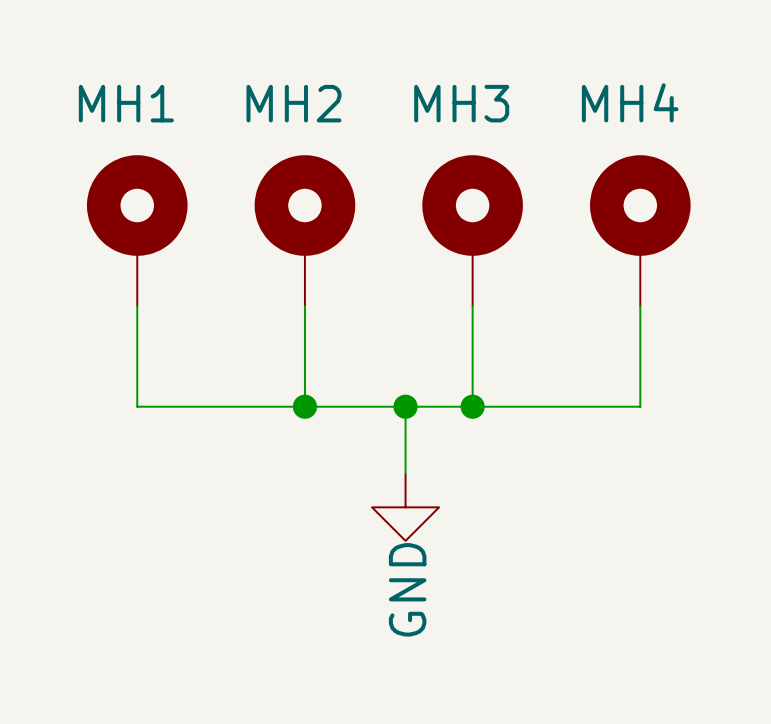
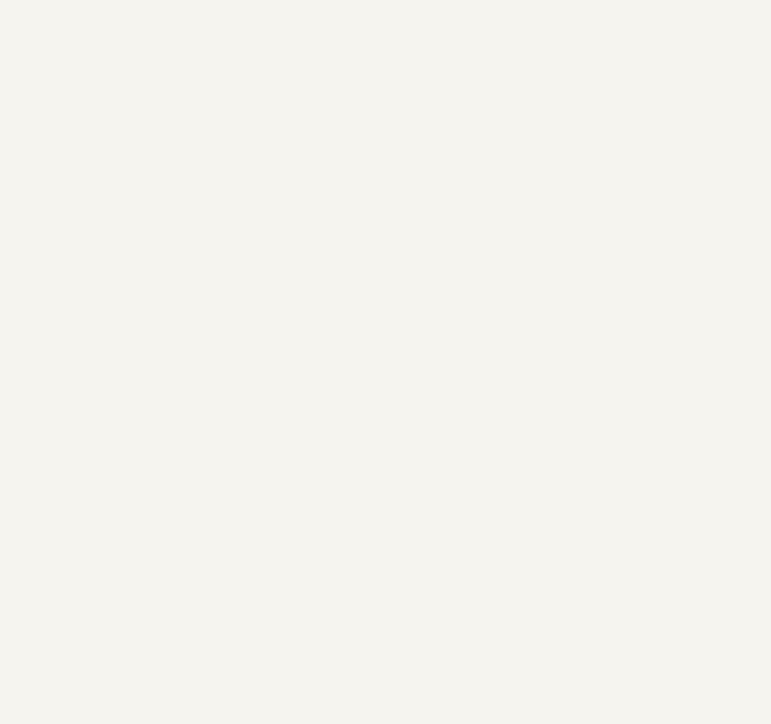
MH1: (137, 230) -> none
MH2: (304, 230) -> none
MH3: (472, 230) -> none
MH4: (640, 230) -> none
wire: (137, 306) (137, 406) (640, 406) (640, 306) -> none
wire: (304, 306) (304, 406) -> none
wire: (472, 306) (472, 406) -> none
junction: (304, 406) -> none
wire: (405, 406) (405, 473) -> none
junction: (405, 406) -> none
junction: (472, 406) -> none
power symbol: GND (405, 507) -> none

